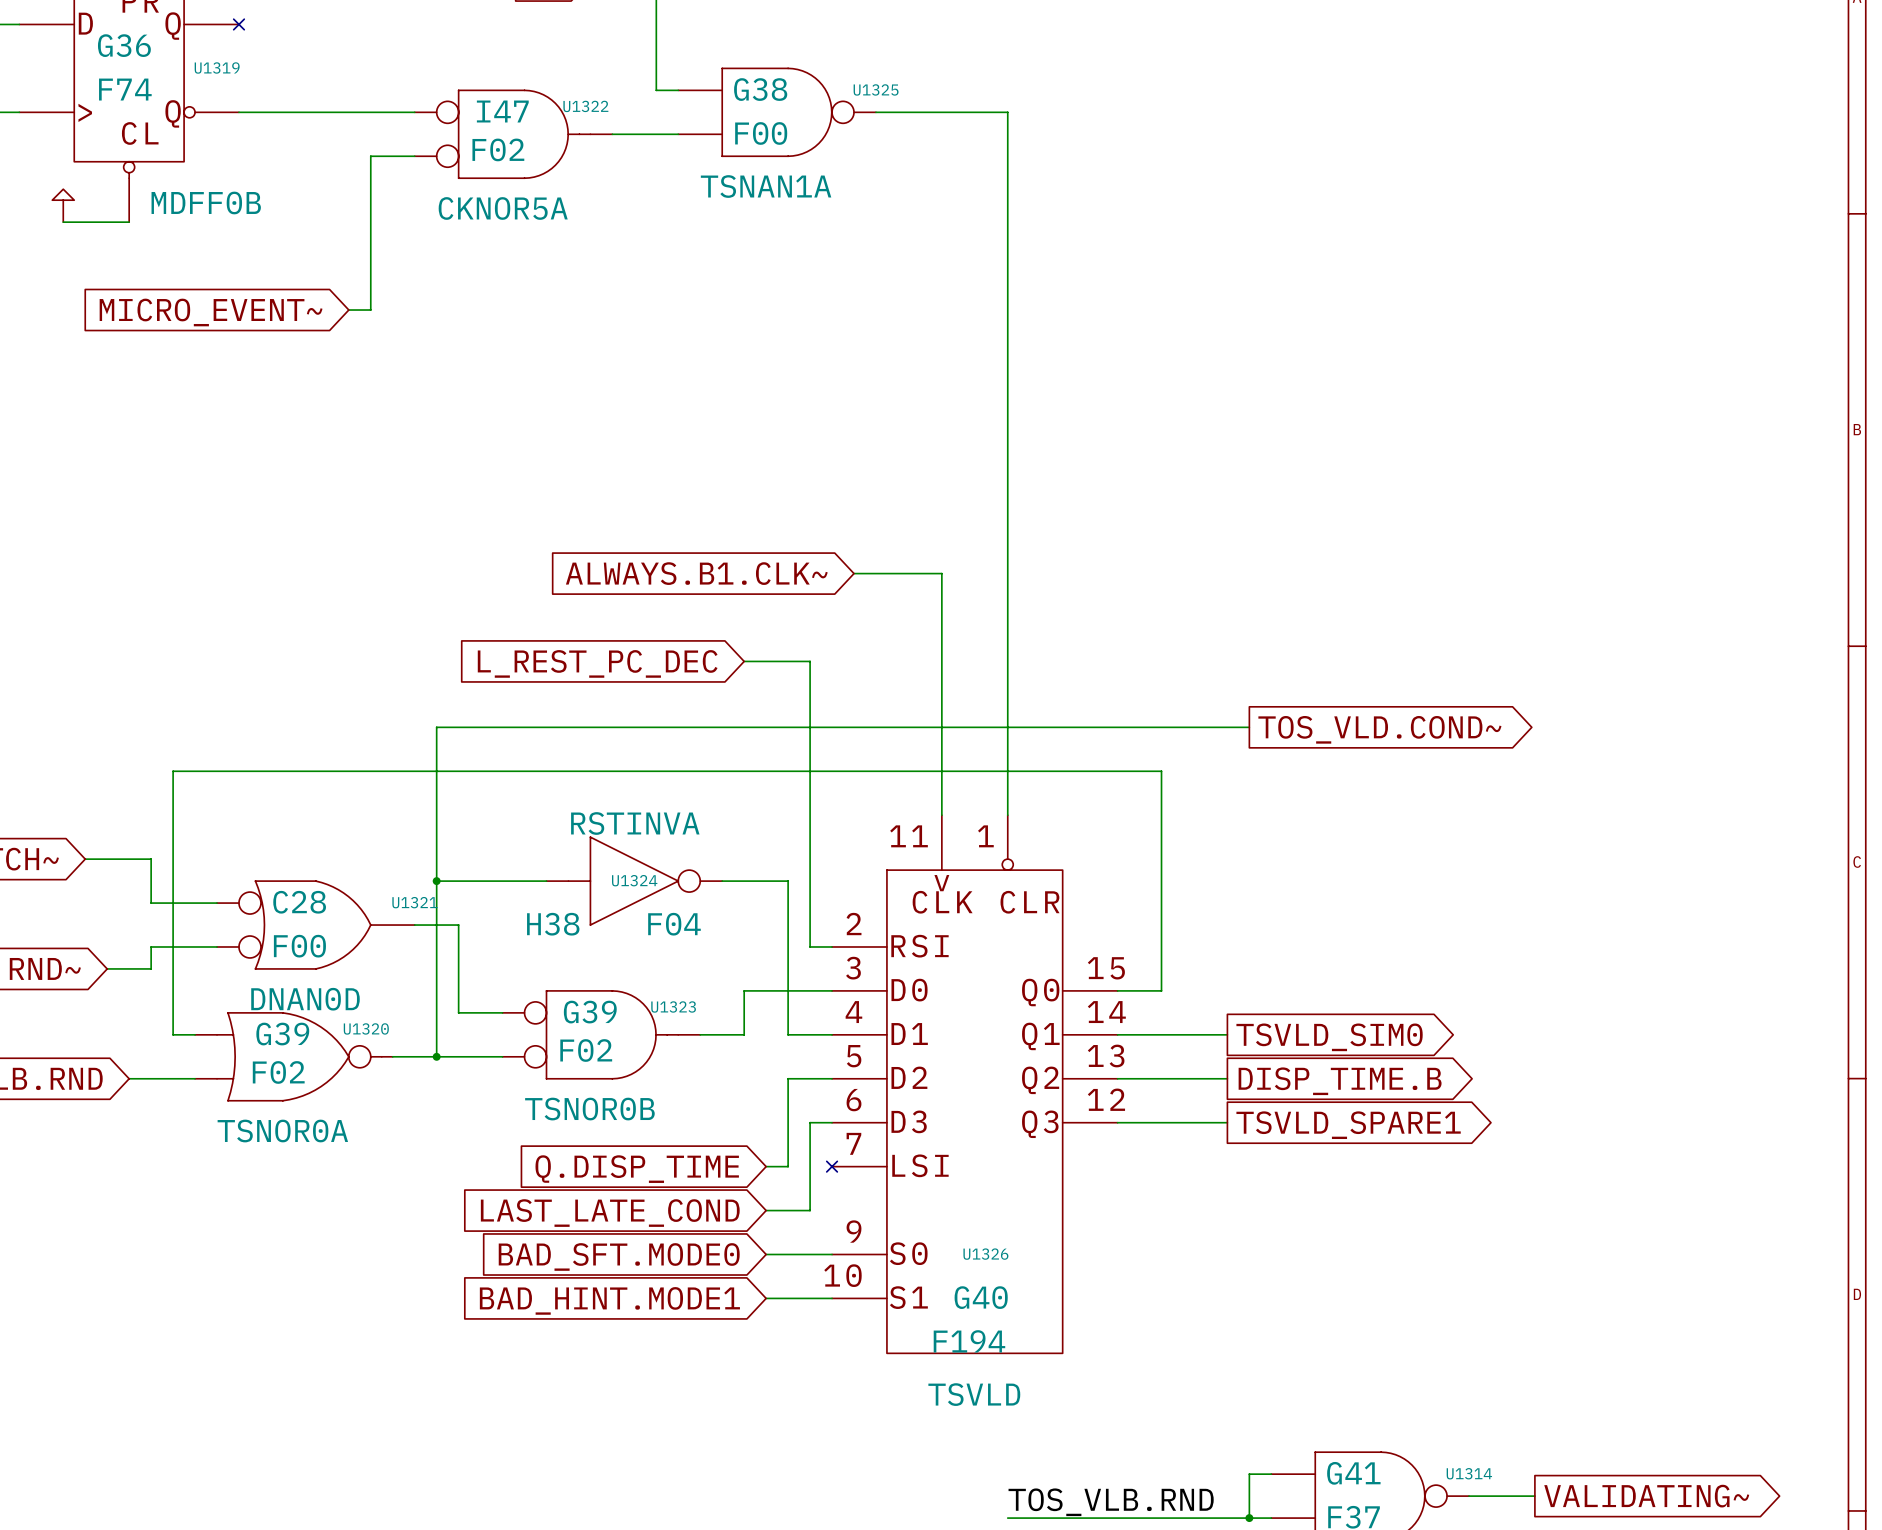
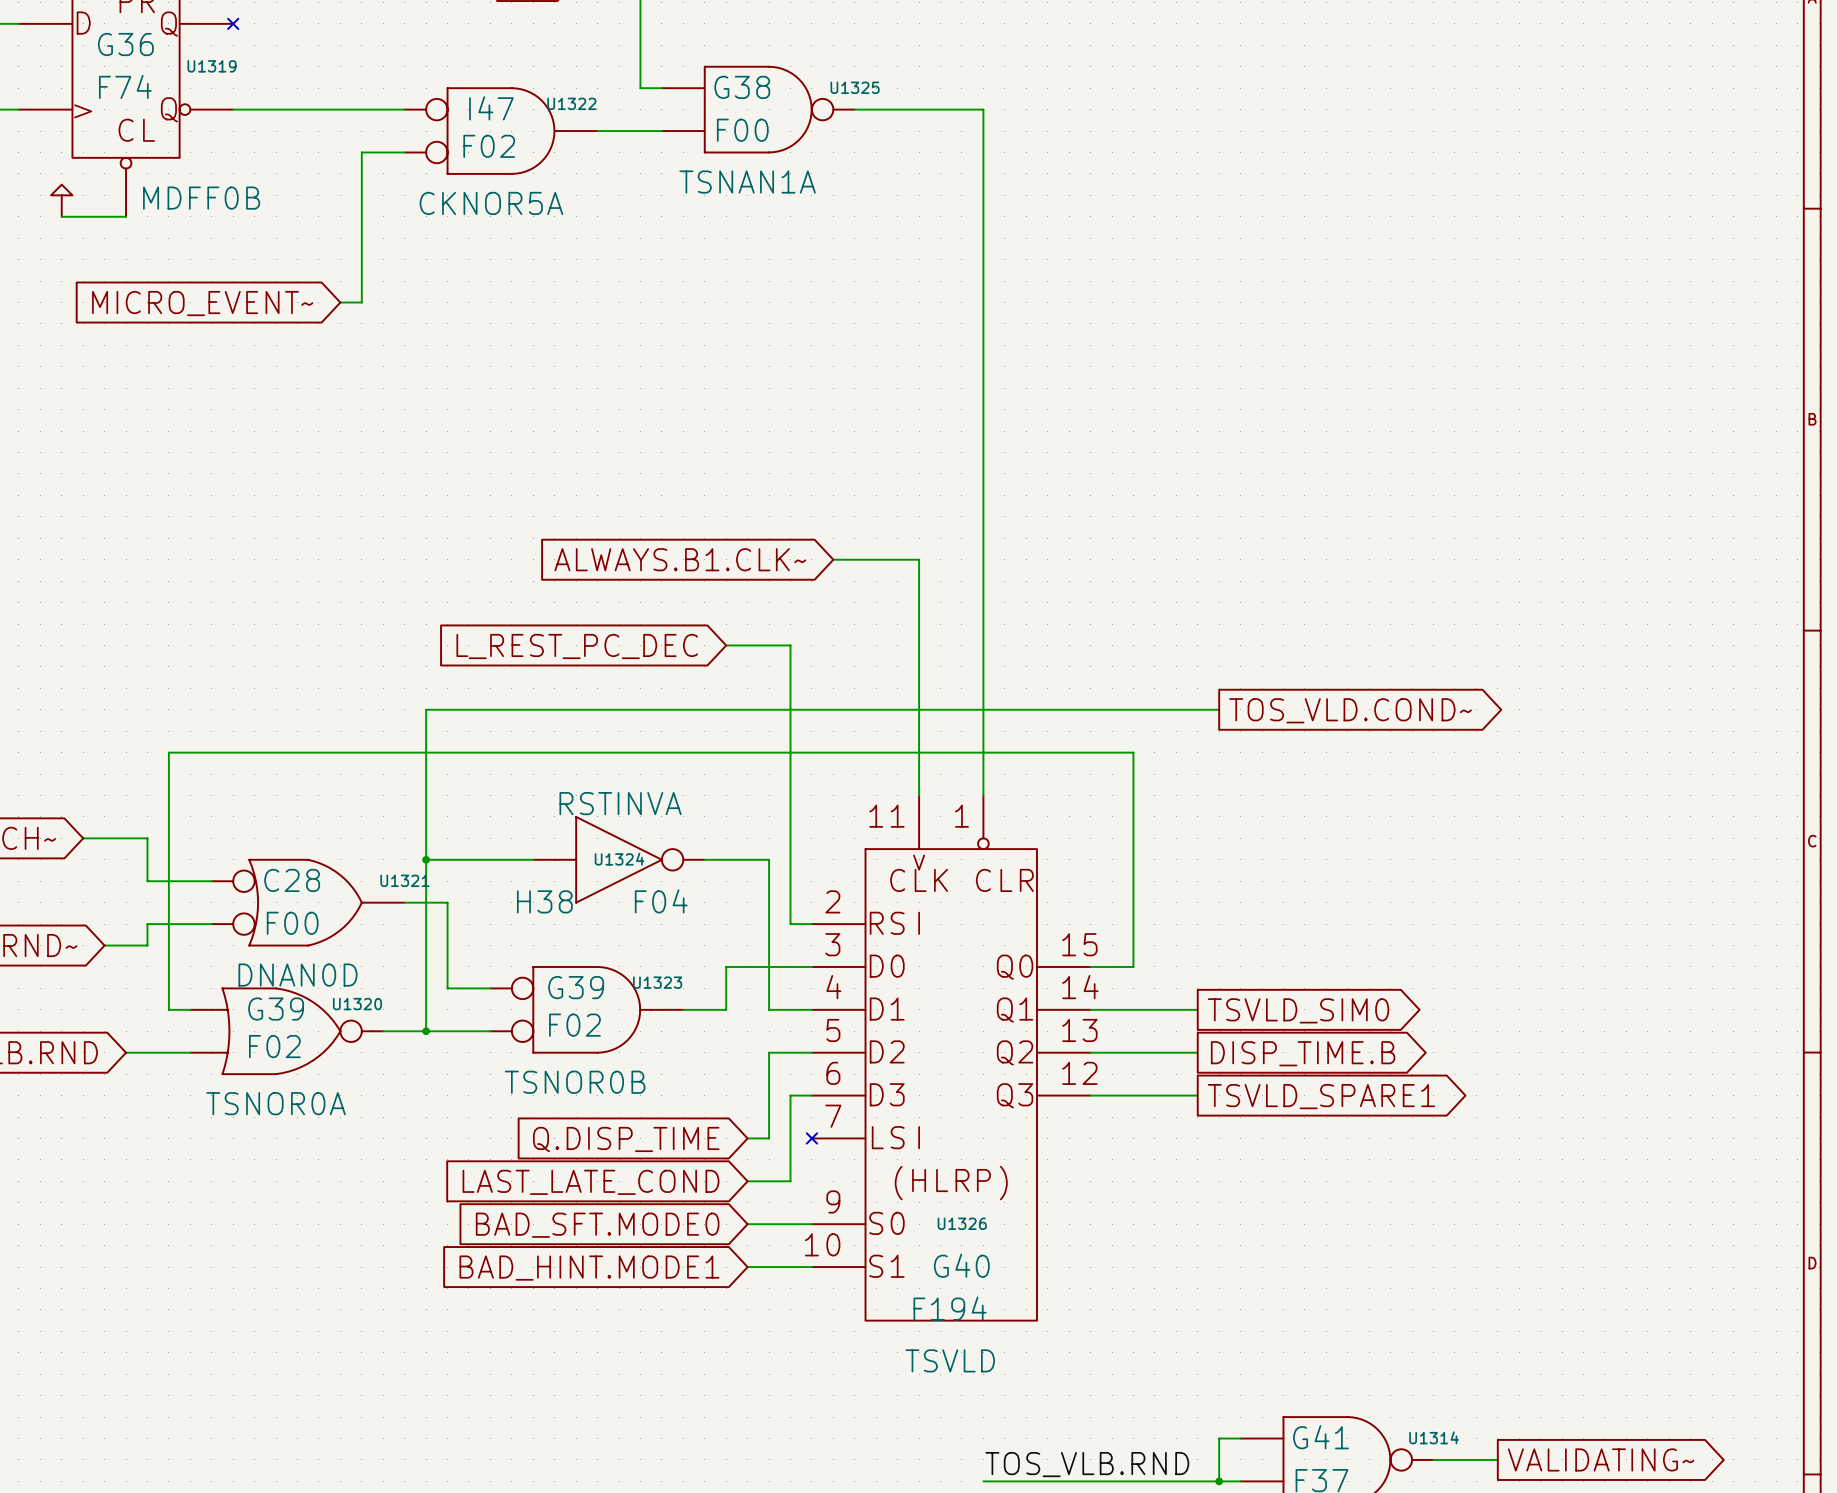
U1326 text: none -> H (919, 1180)
U1326 text: none -> L (942, 1180)
U1326 text: none -> R (962, 1180)
U1326 text: none -> P (983, 1180)
U1326 text: none -> ( (898, 1183)
U1326 text: none -> ) (1003, 1183)

